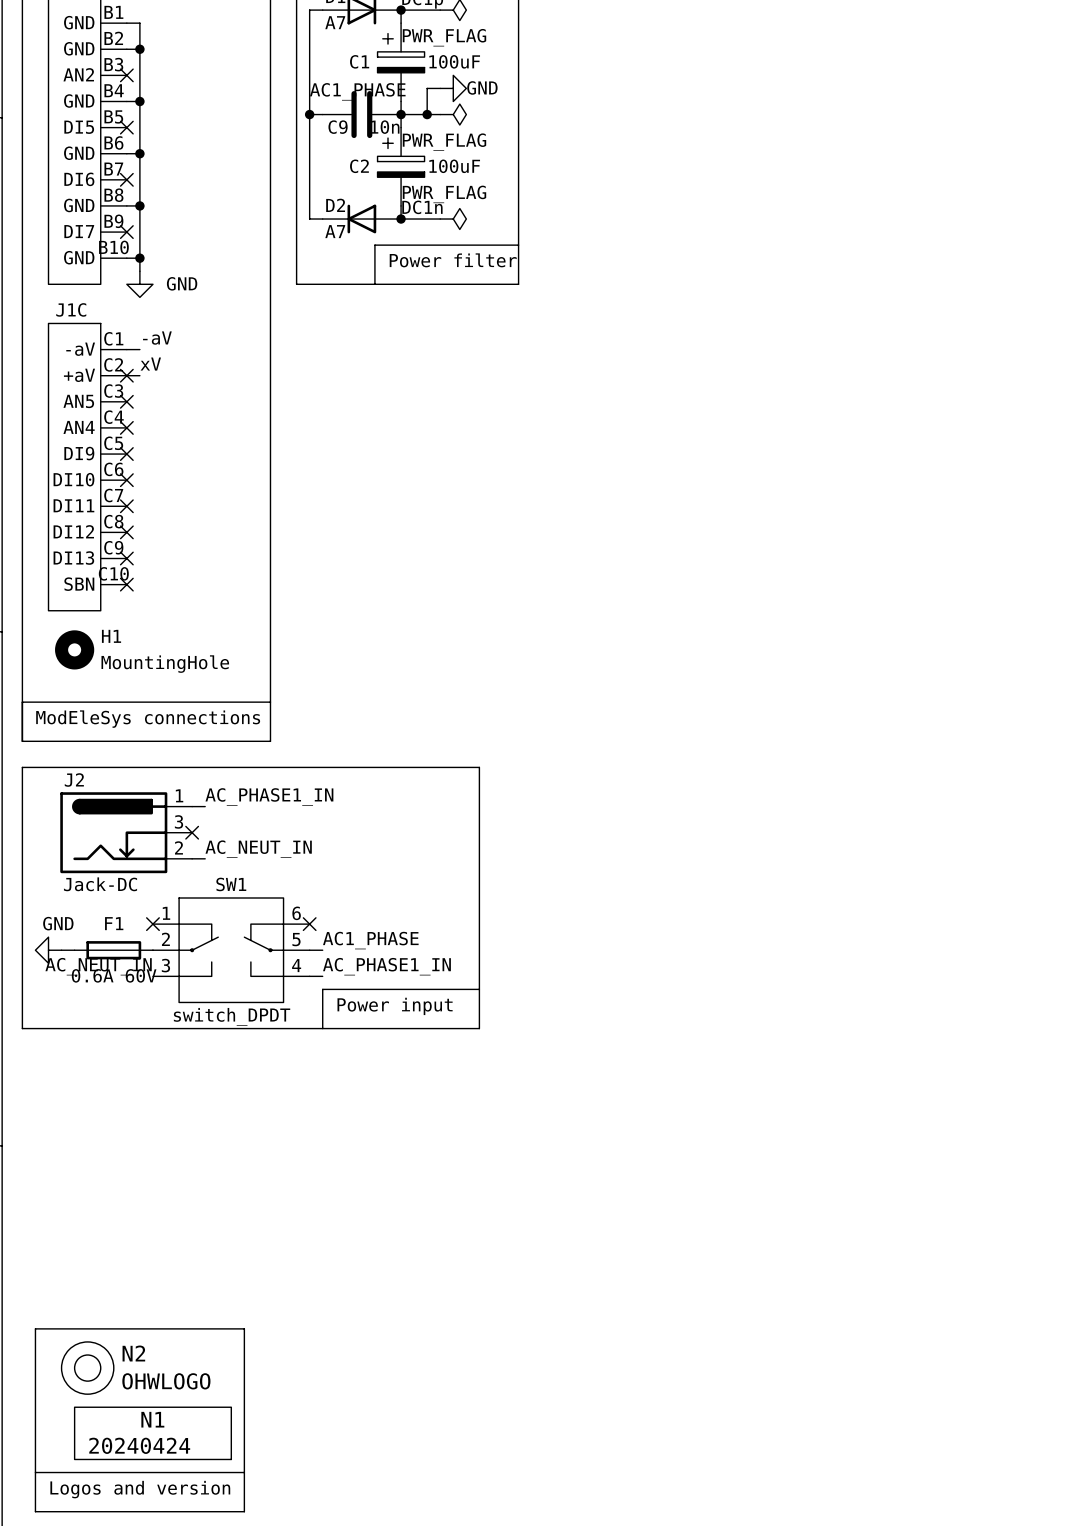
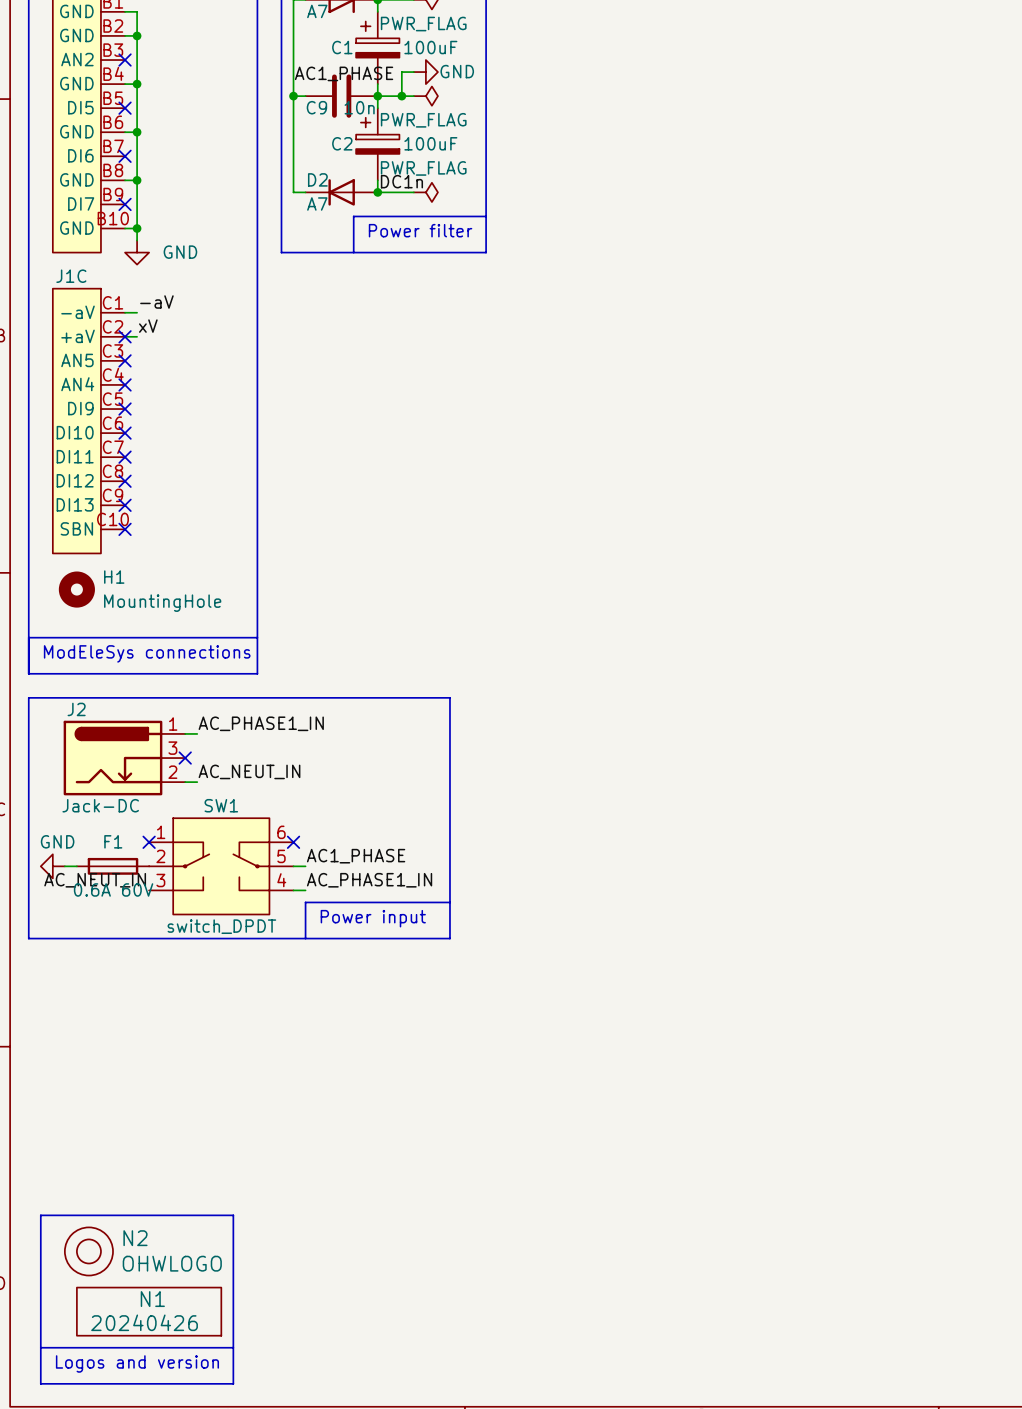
N1 value: 20240424 (139, 1445) -> 20240426 (144, 1322)

